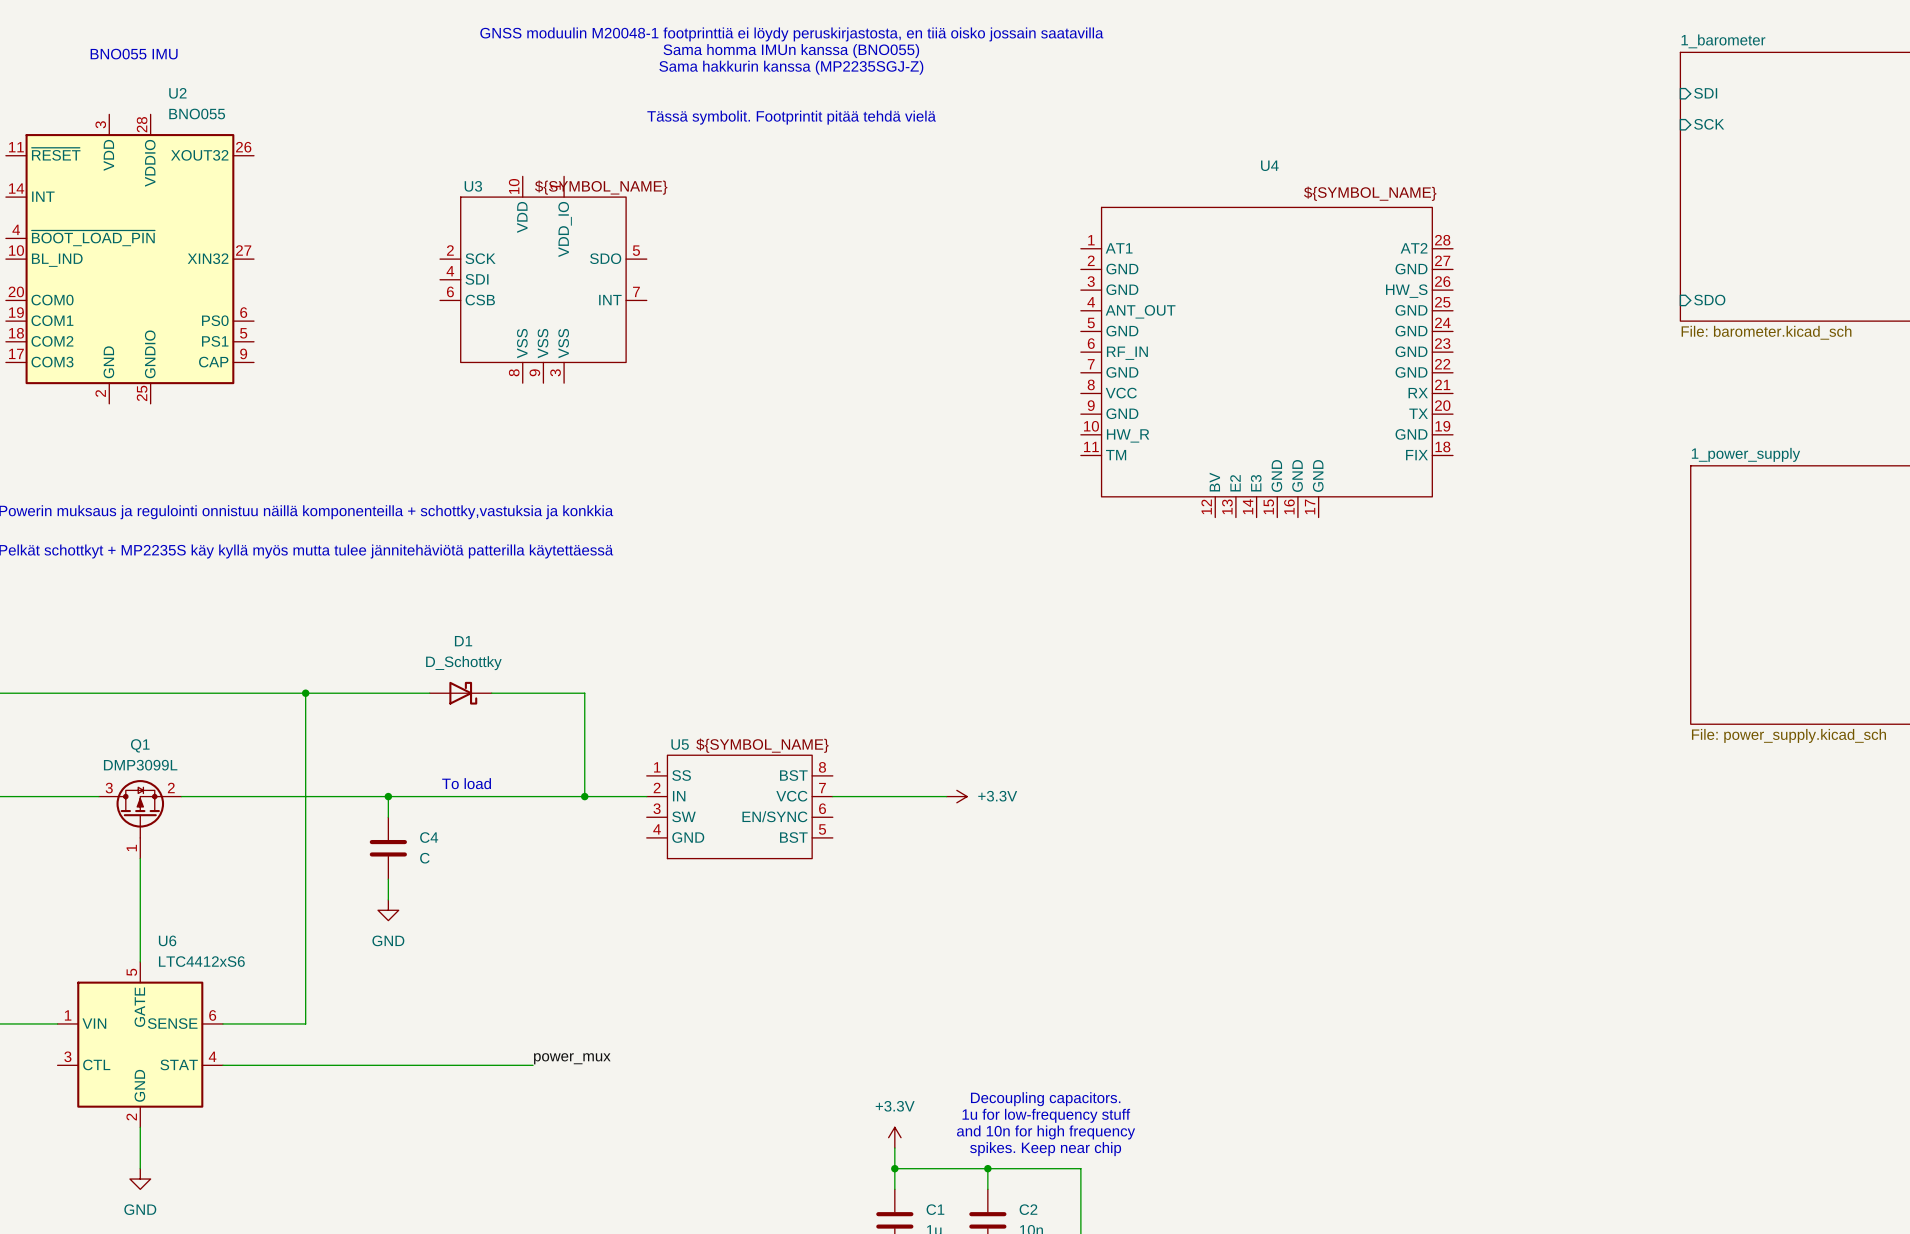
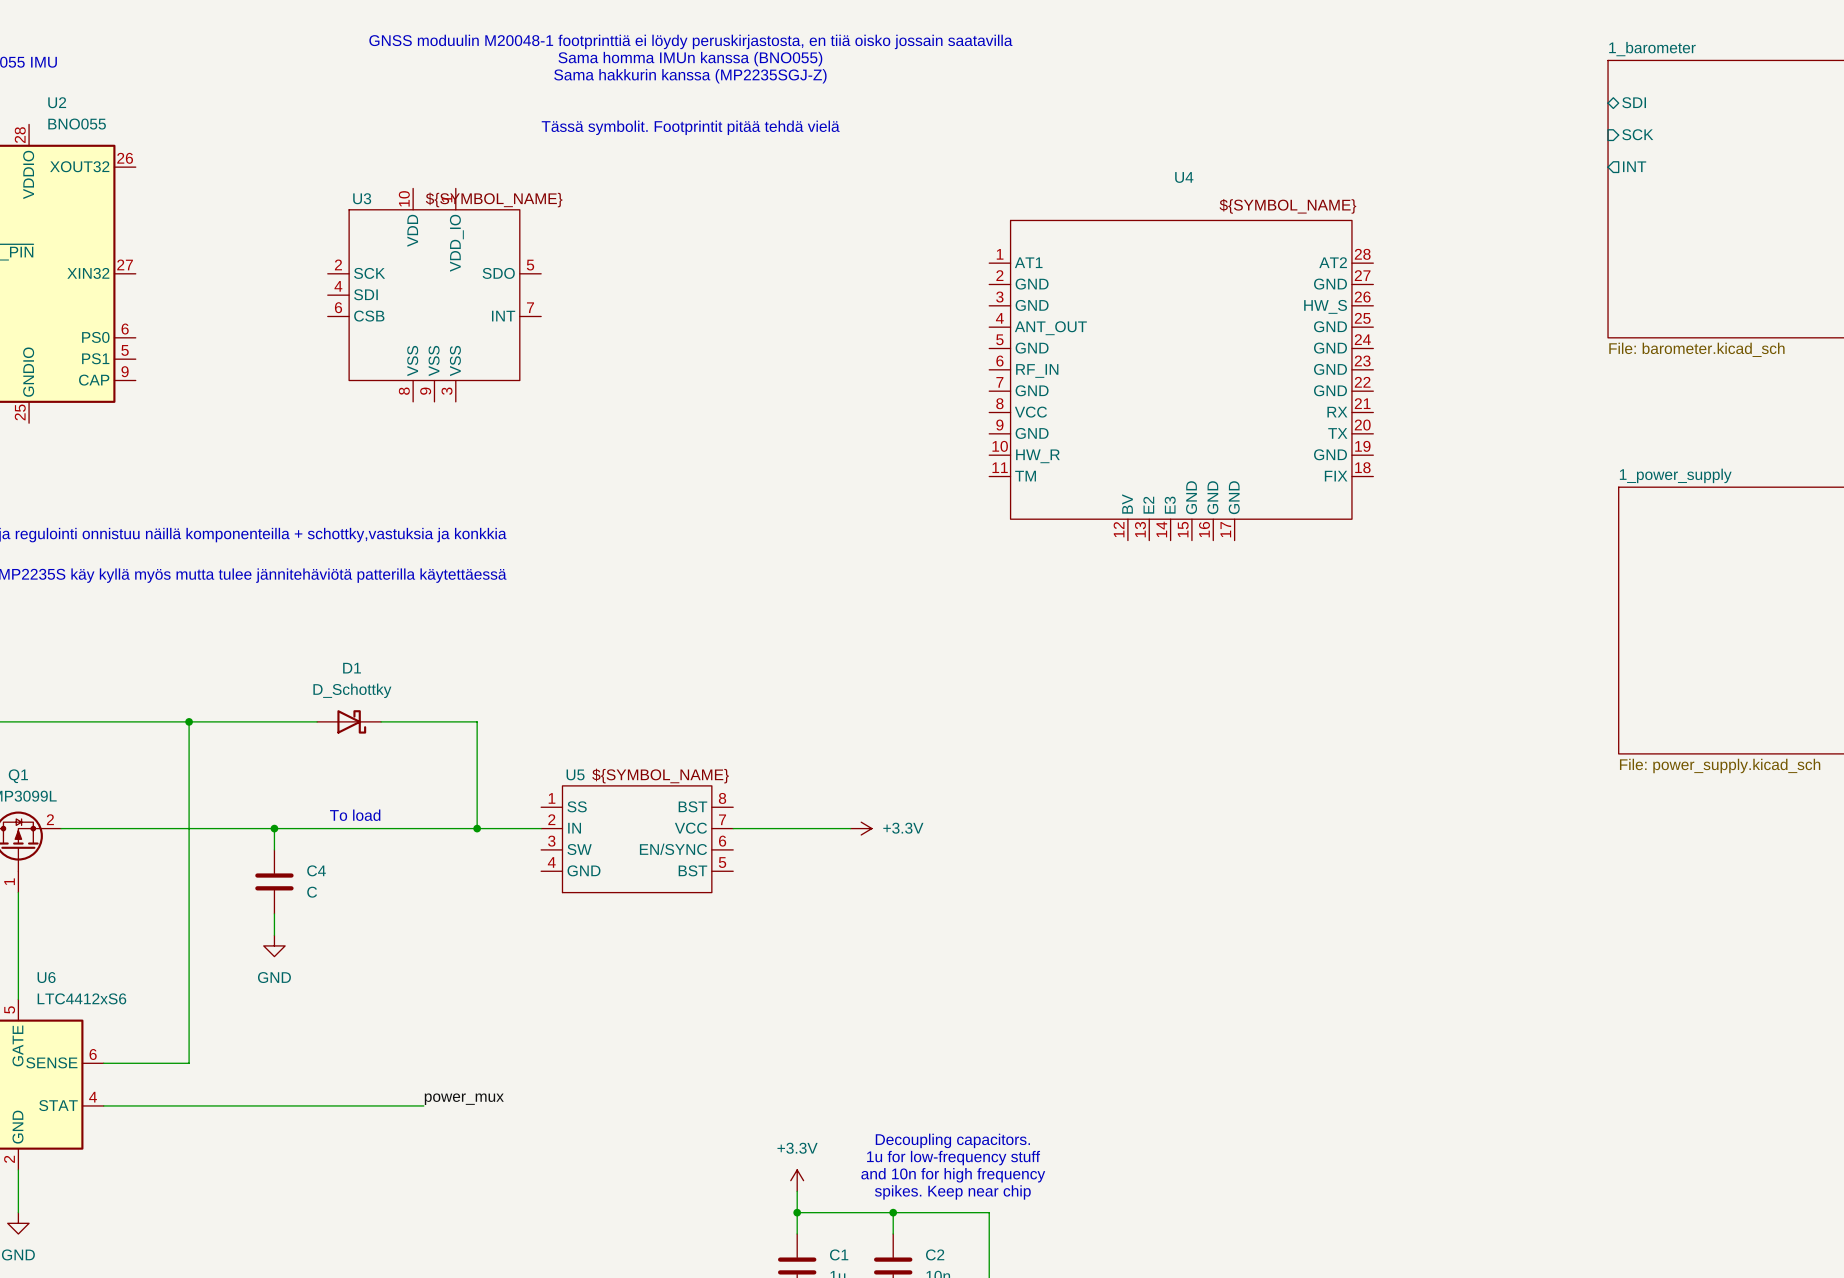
sheet pin shape: input (1705, 93) -> bidirectional (1634, 102)
sheet pin: none -> INT (1634, 166)
sheet pin: SDO (1709, 300) -> none

